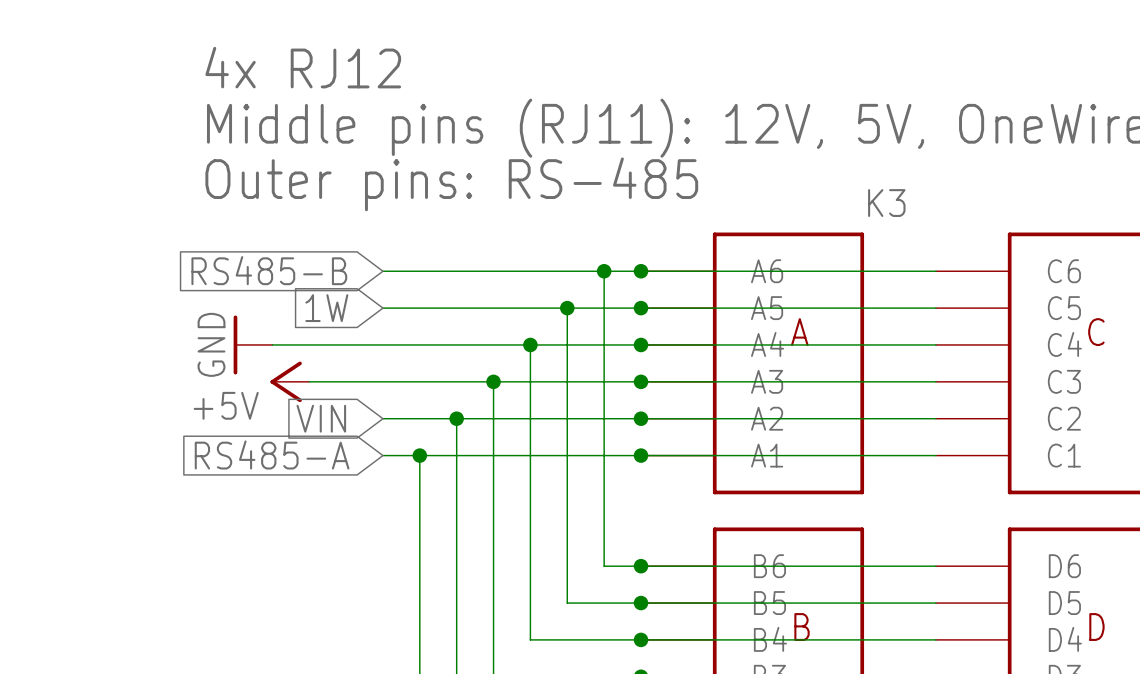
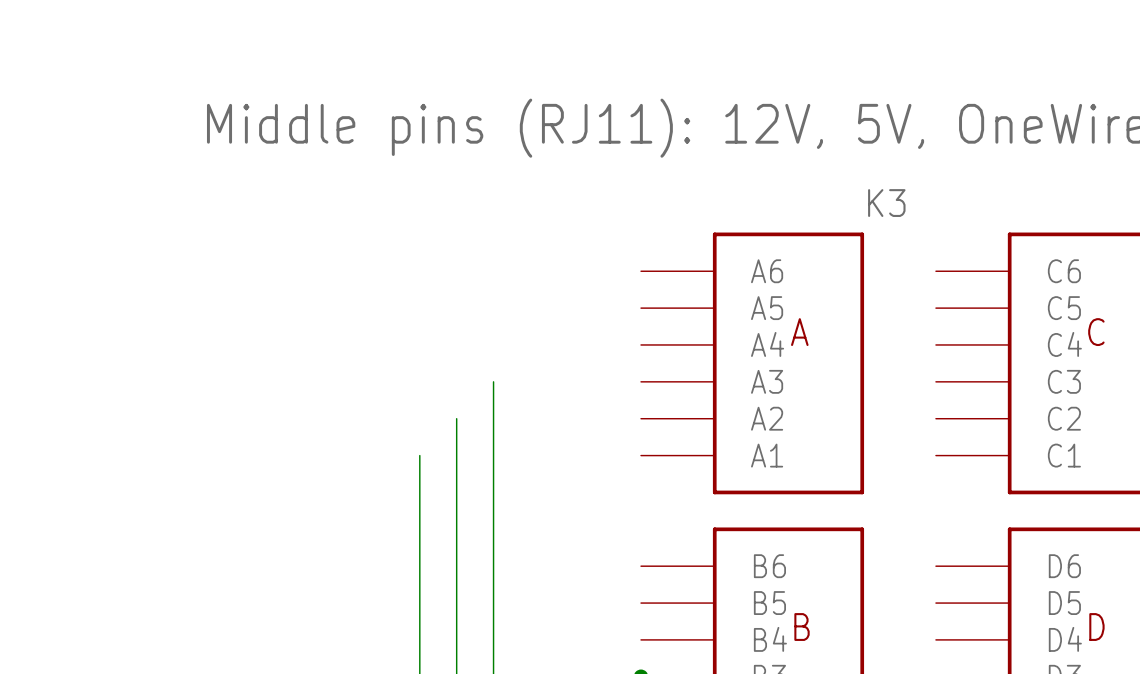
text: 4x RJ12 (303, 67) -> none
text: Outer pins: RS-485 (451, 184) -> none
global label: RS485-B (269, 270) -> none
wire: (382, 271) (935, 271) -> none
wire: (604, 271) (604, 566) (935, 566) -> none
junction: (604, 271) -> none
junction: (641, 271) -> none
global label: 1W (326, 308) -> none
wire: (382, 308) (935, 308) -> none
wire: (567, 308) (567, 603) (935, 603) -> none
junction: (567, 308) -> none
junction: (641, 308) -> none
power symbol: GND (252, 344) -> none
wire: (272, 344) (935, 344) -> none
wire: (530, 344) (530, 639) (935, 639) -> none
junction: (530, 344) -> none
junction: (641, 344) -> none
power symbol: +5V (289, 381) -> none
wire: (309, 381) (935, 381) -> none
junction: (493, 381) -> none
junction: (641, 381) -> none
global label: VIN (321, 418) -> none
wire: (382, 418) (935, 418) -> none
junction: (456, 418) -> none
junction: (641, 418) -> none
global label: RS485-A (272, 454) -> none
wire: (382, 455) (935, 455) -> none
junction: (419, 455) -> none
junction: (641, 455) -> none
junction: (641, 566) -> none
junction: (641, 603) -> none
junction: (641, 639) -> none

